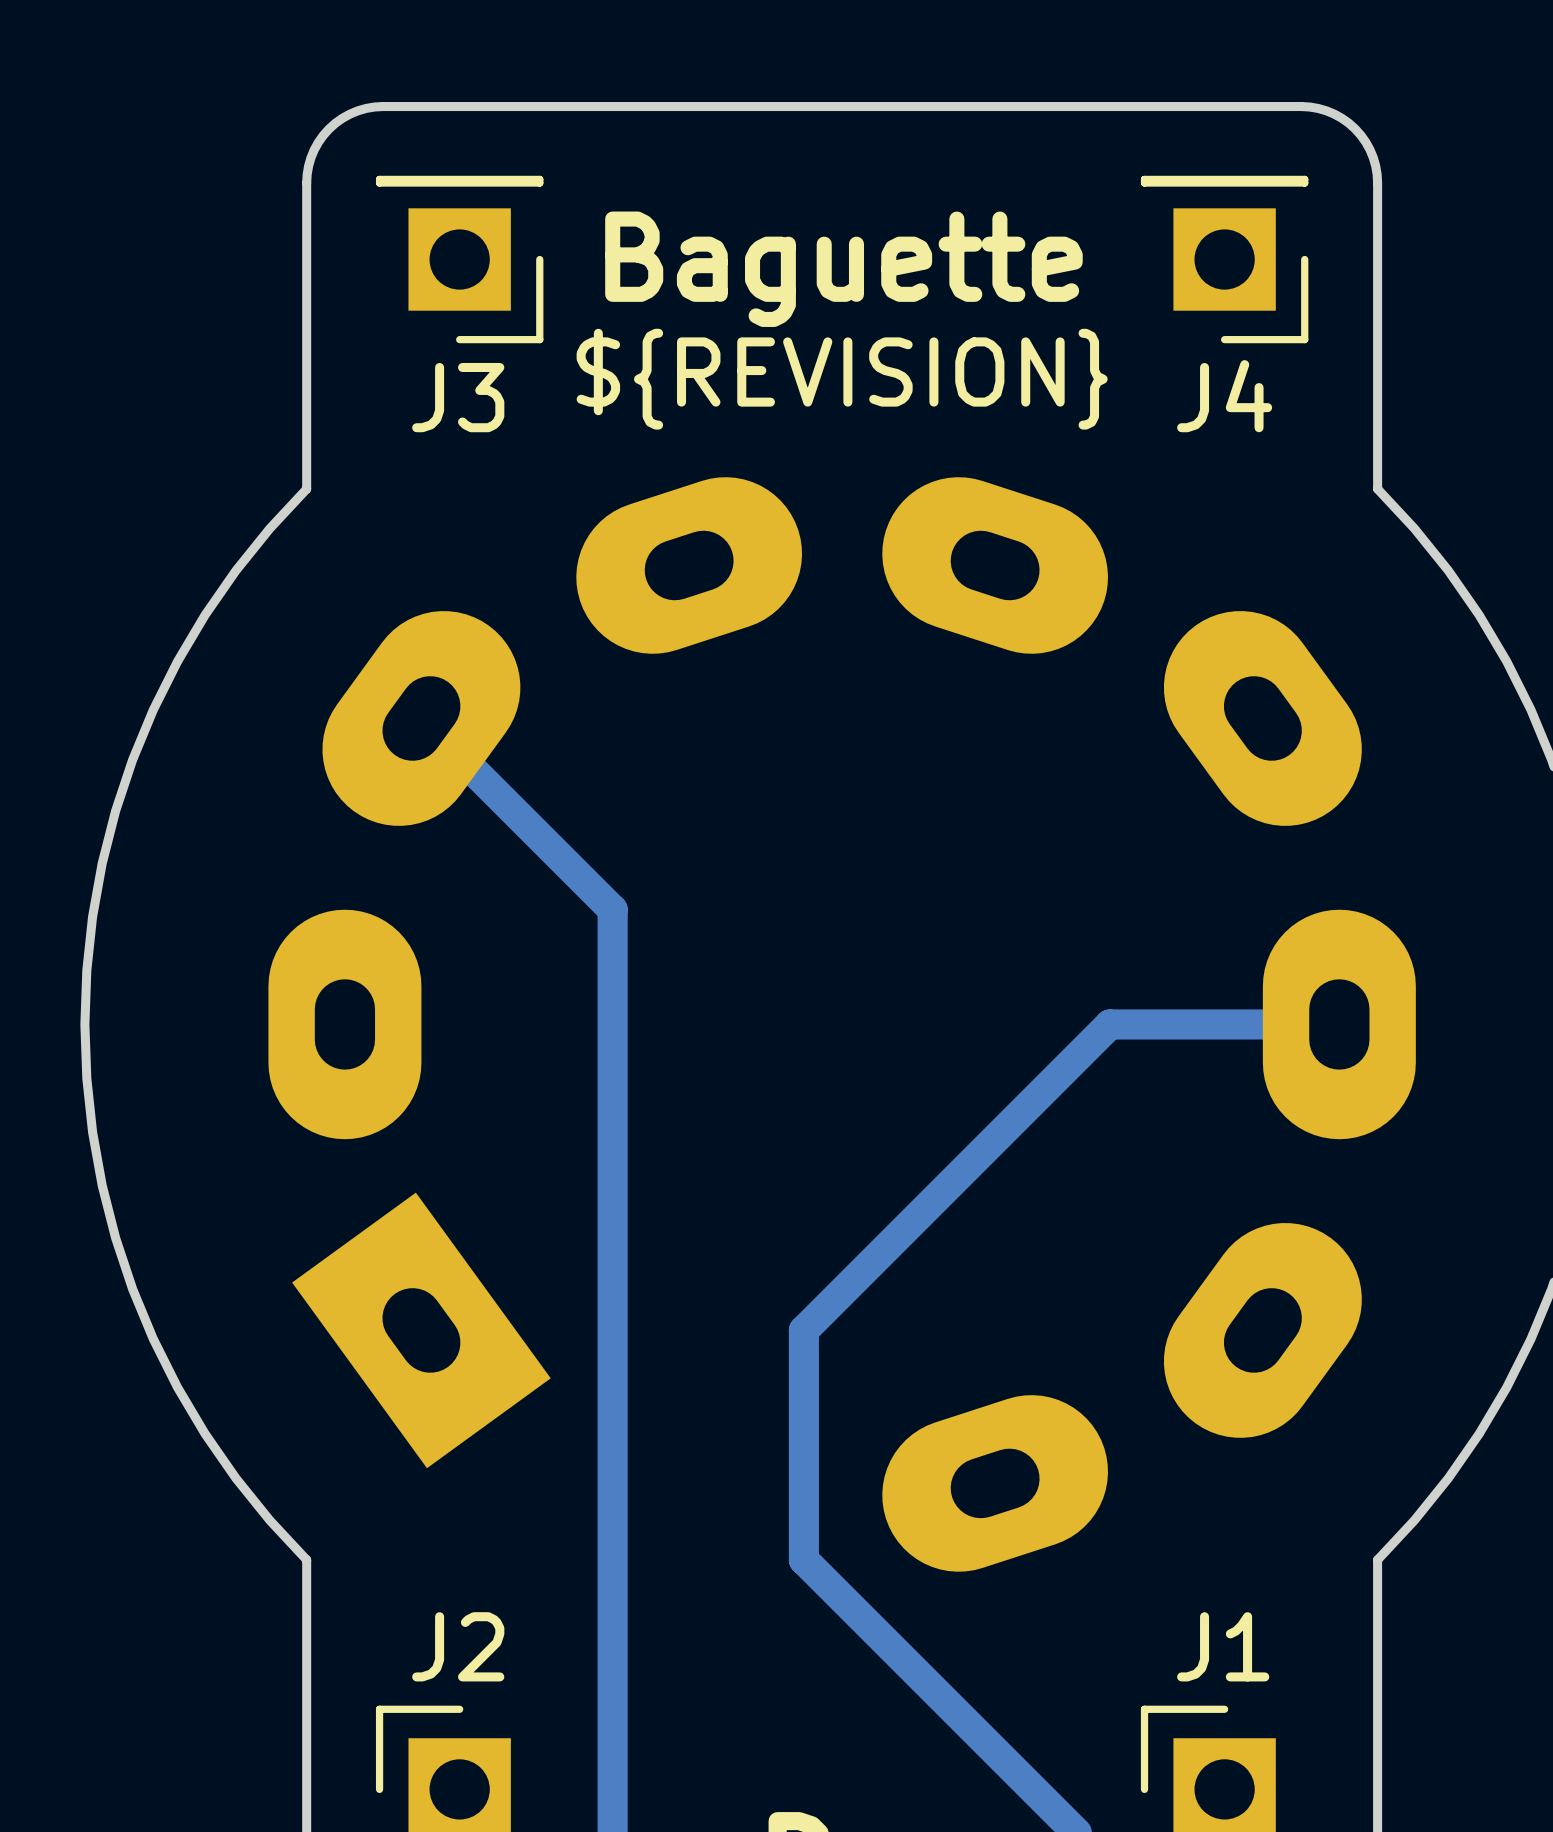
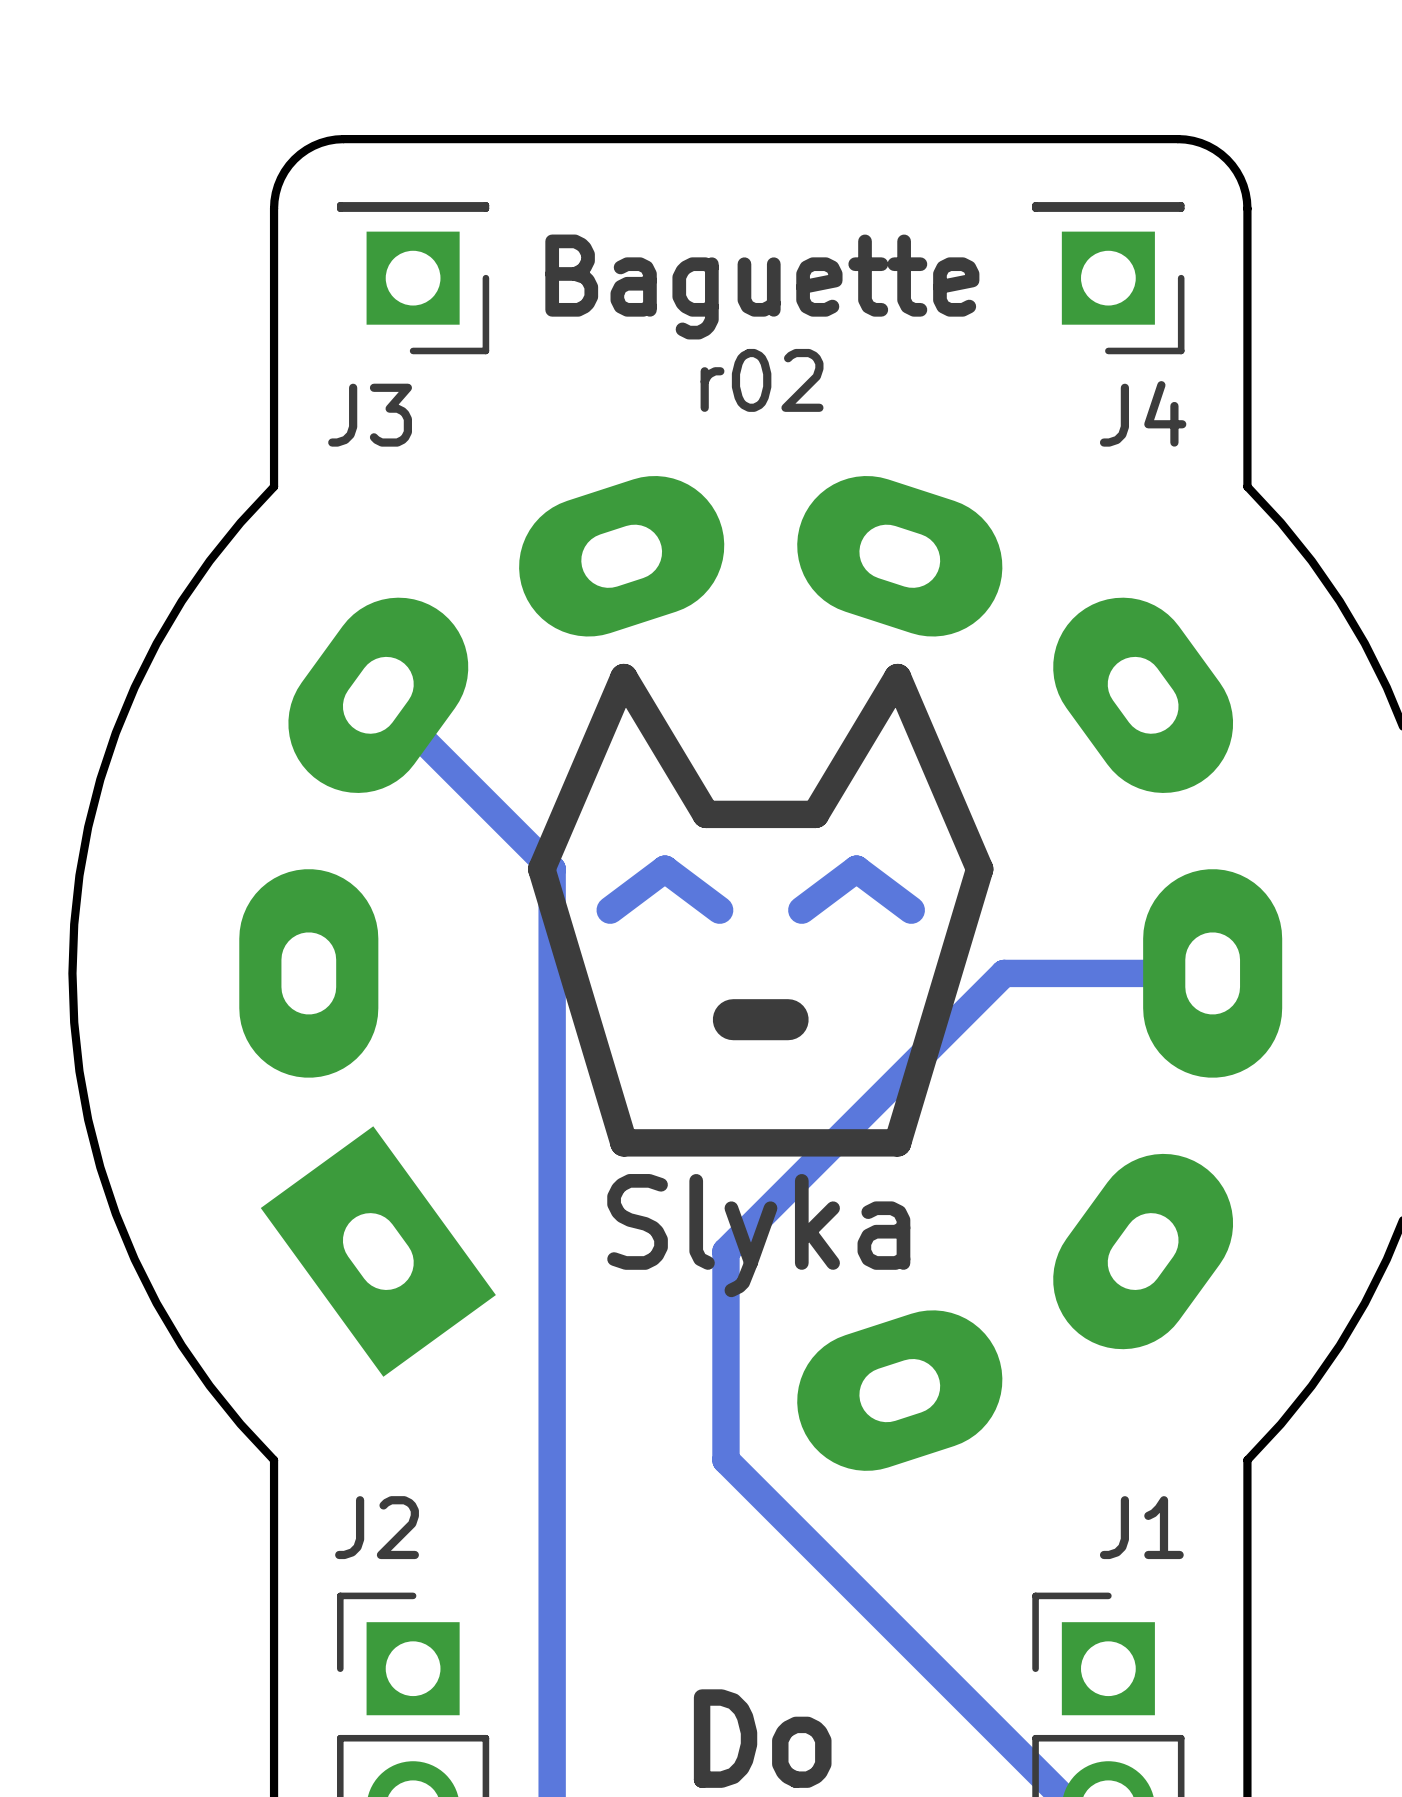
text: ${REVISION} (842, 379) -> r02 (762, 380)
J4 name position: J4 (1224, 396) -> J4 (1143, 413)
J3 name position: J3 (458, 397) -> J3 (370, 415)
drawing: none -> [528, 663, 994, 1157]
J2 name position: J2 (458, 1646) -> J2 (377, 1527)
J1 name position: J1 (1223, 1646) -> J1 (1141, 1527)

